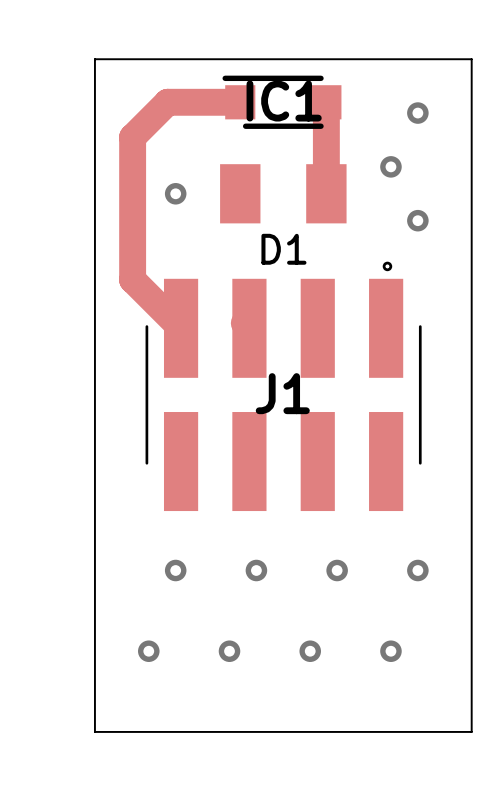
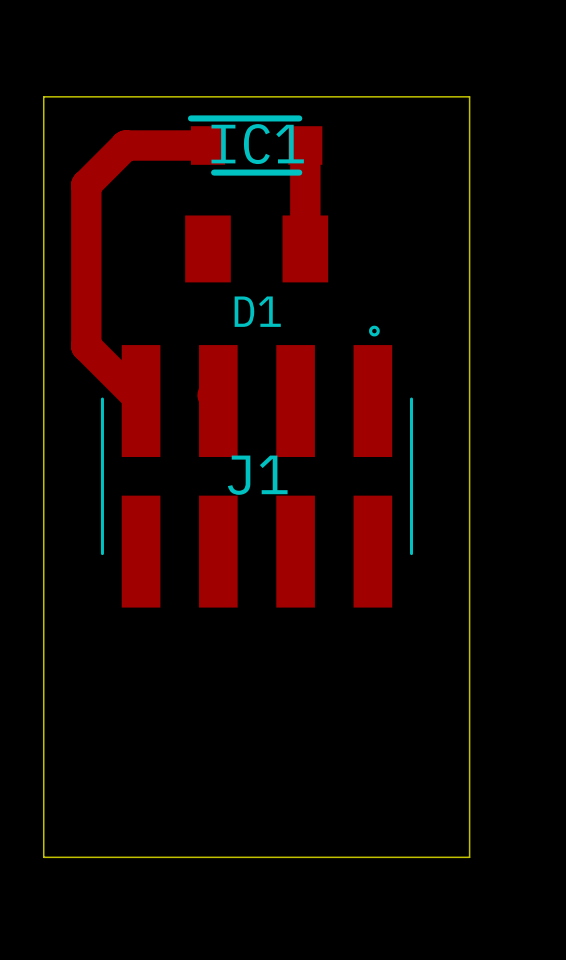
via: (417, 113) -> none
via: (390, 166) -> none
via: (175, 193) -> none
via: (417, 220) -> none
via: (175, 570) -> none
via: (256, 570) -> none
via: (337, 570) -> none
via: (417, 570) -> none
via: (148, 651) -> none
via: (229, 651) -> none
via: (310, 651) -> none
via: (390, 651) -> none

